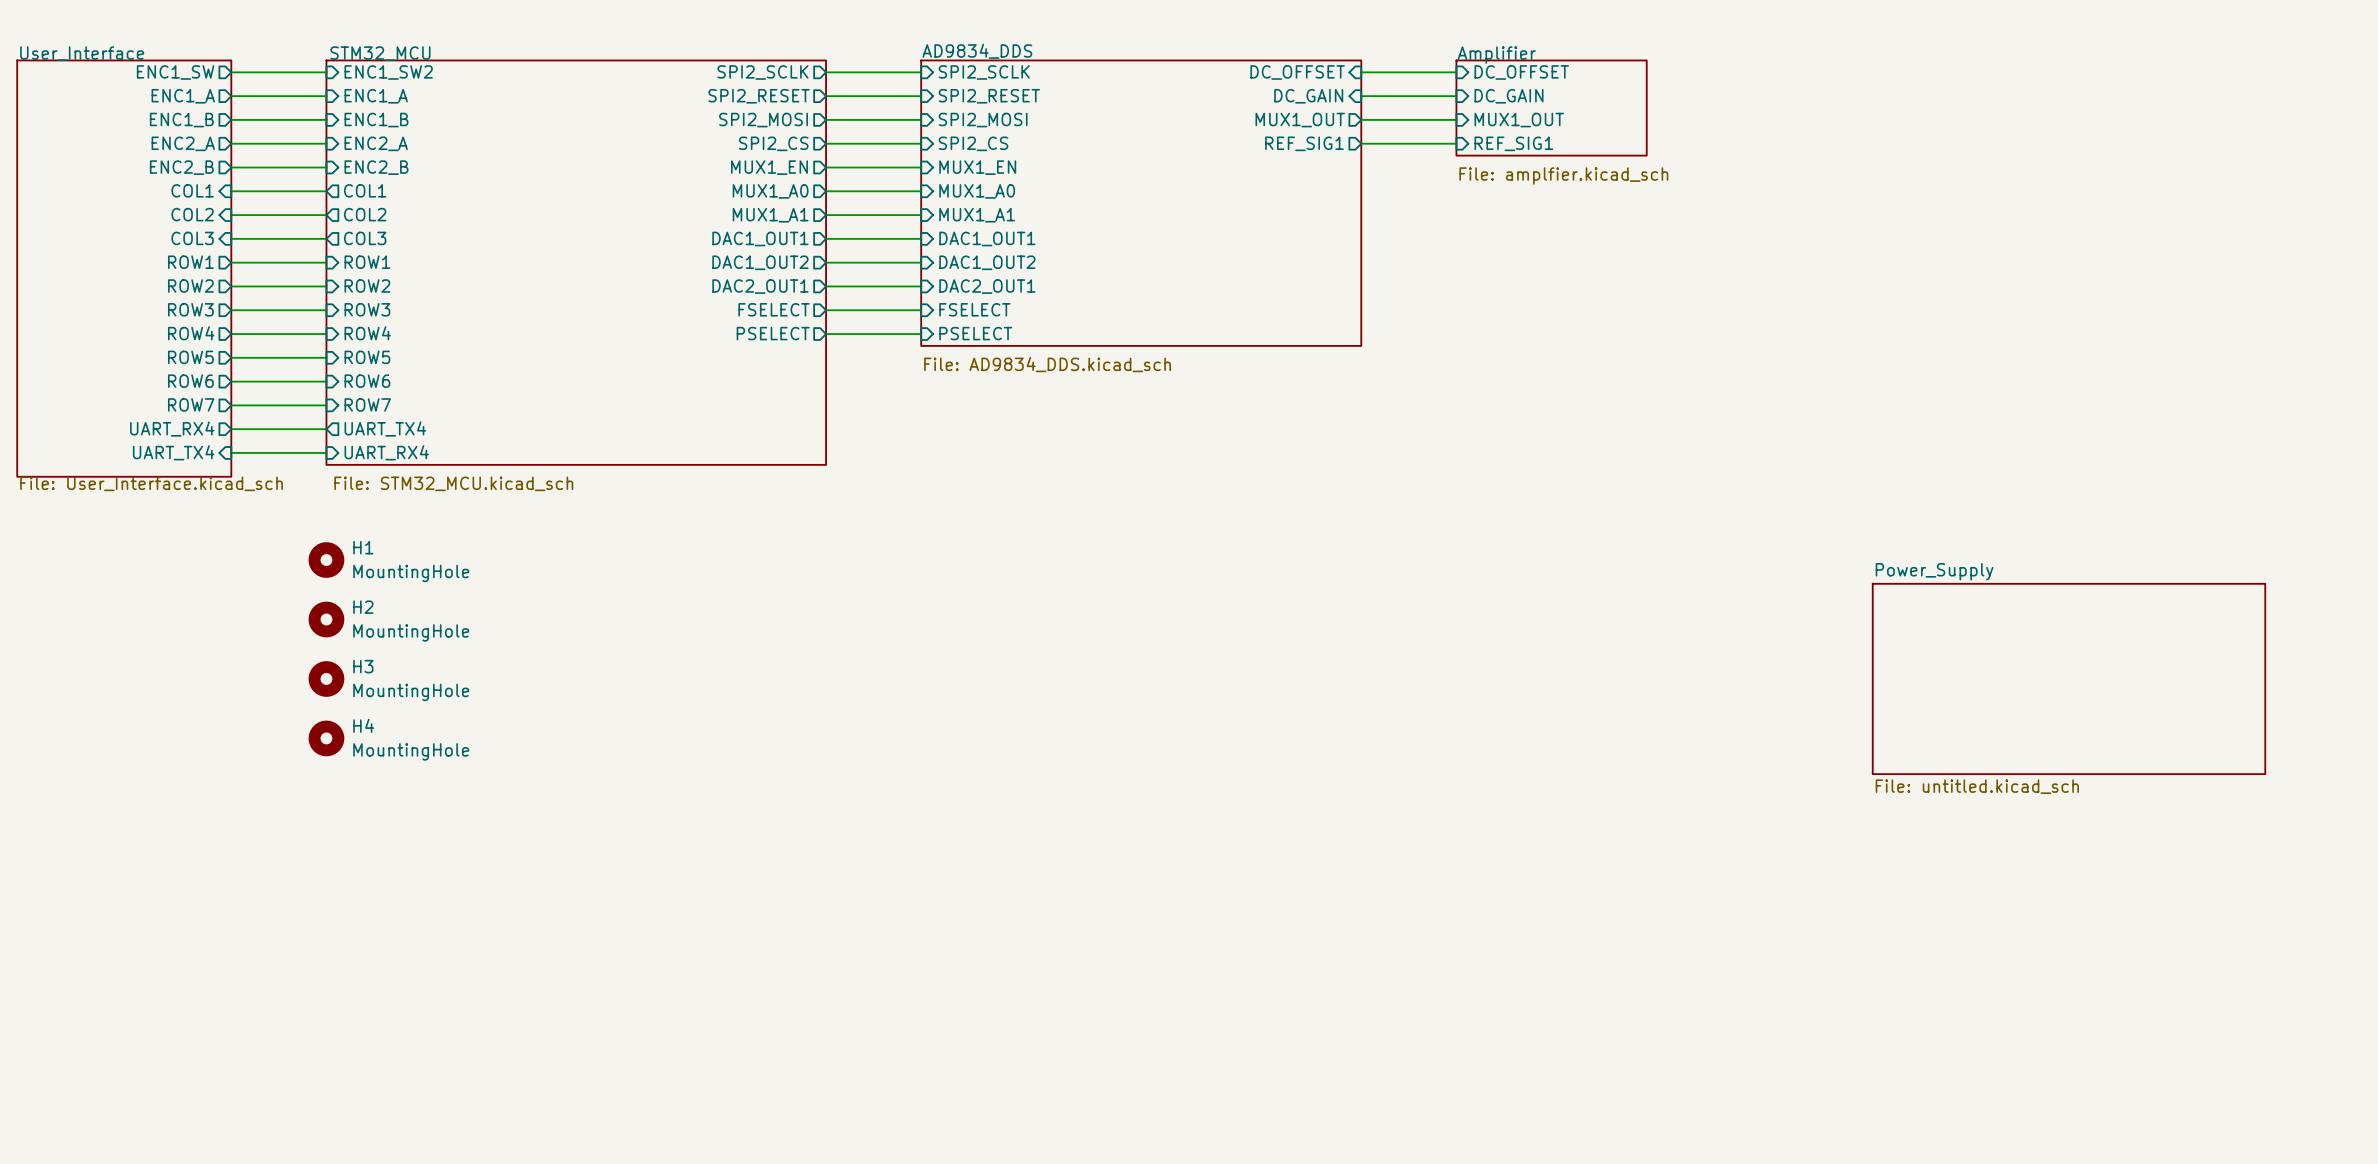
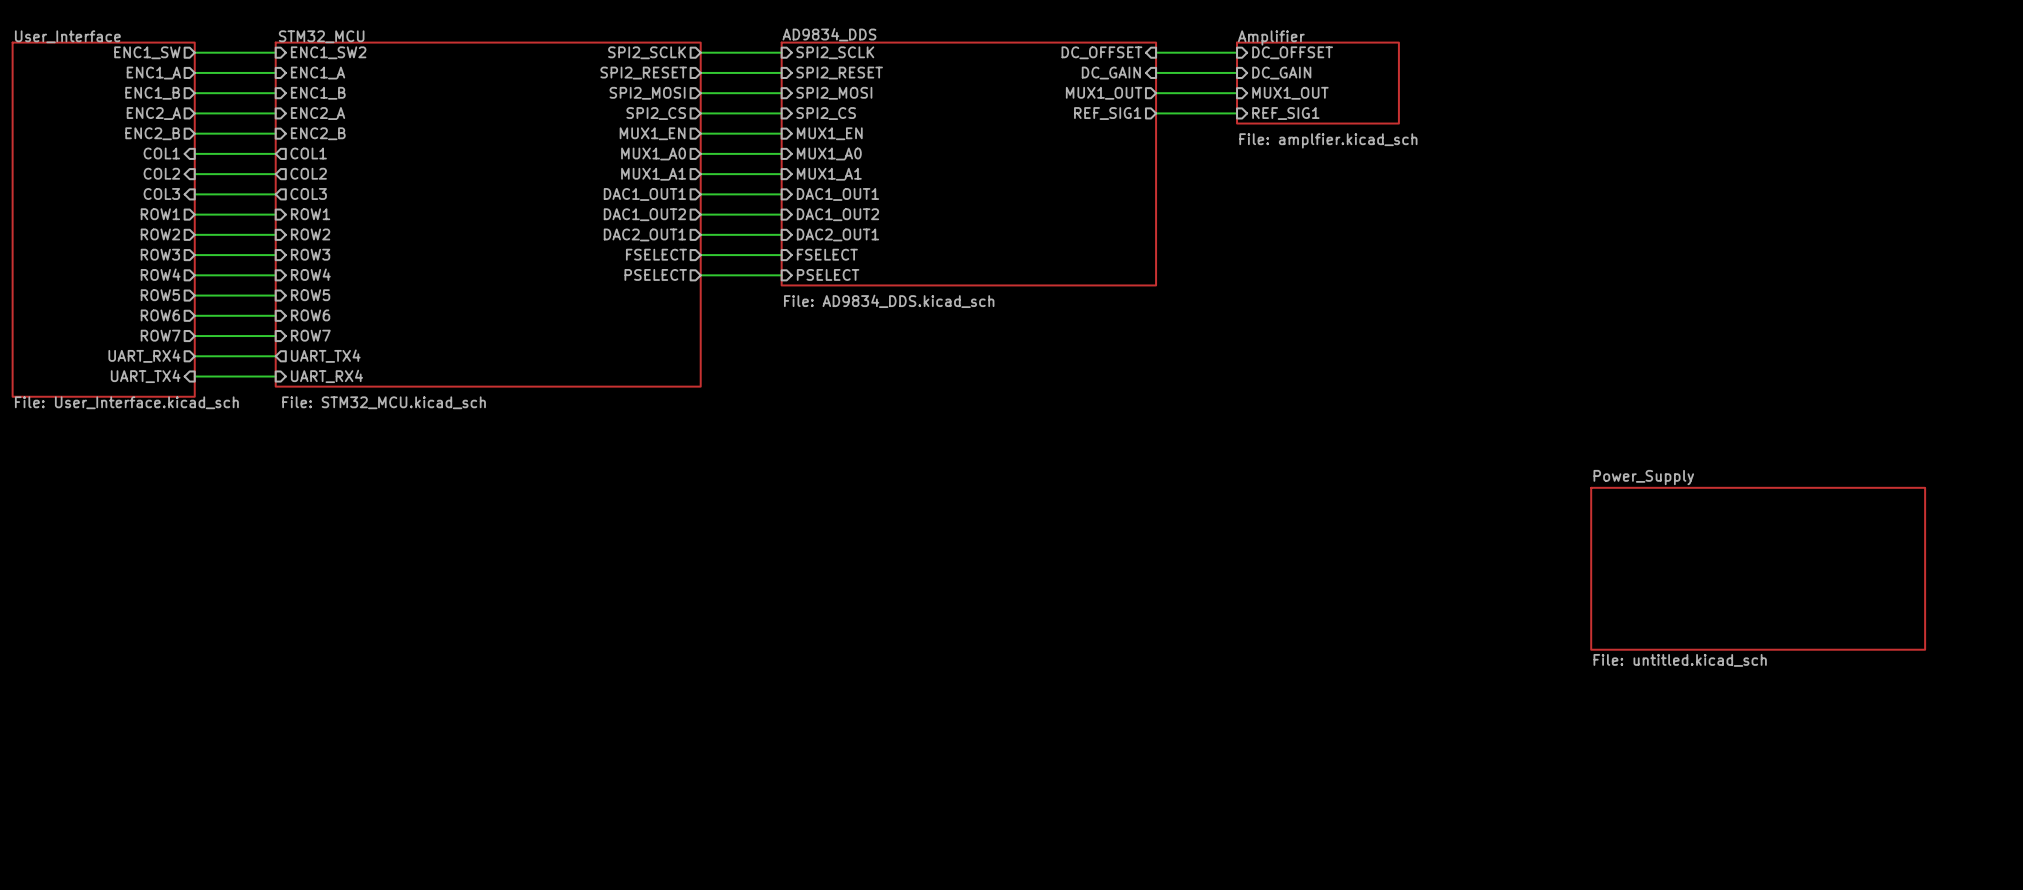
H1: MountingHole (326, 560) -> none
H2: MountingHole (326, 619) -> none
H3: MountingHole (326, 678) -> none
H4: MountingHole (326, 738) -> none

